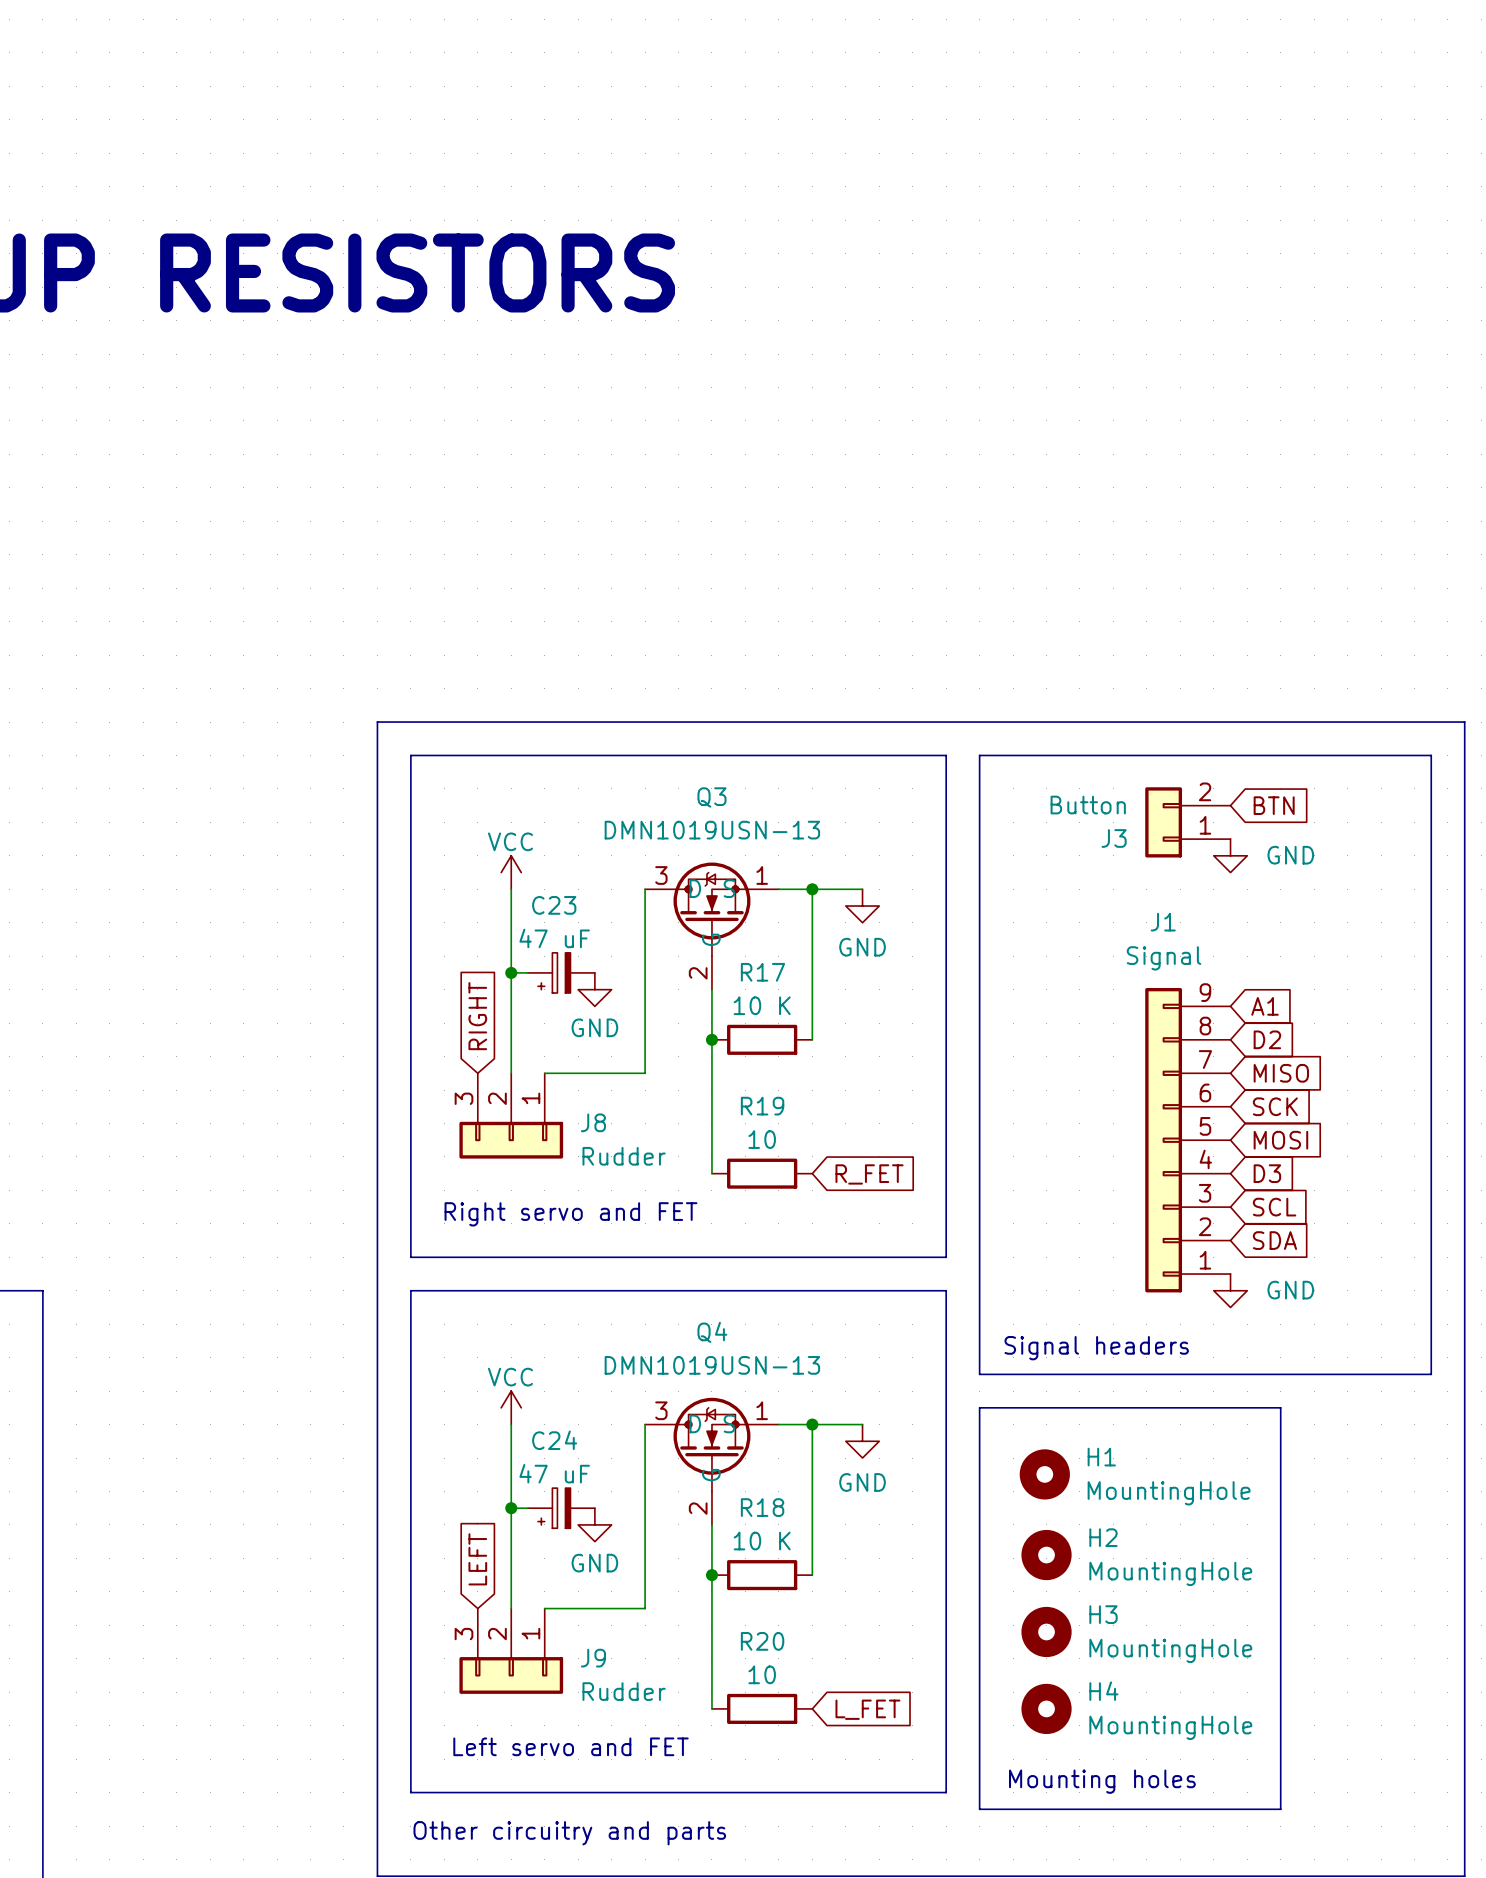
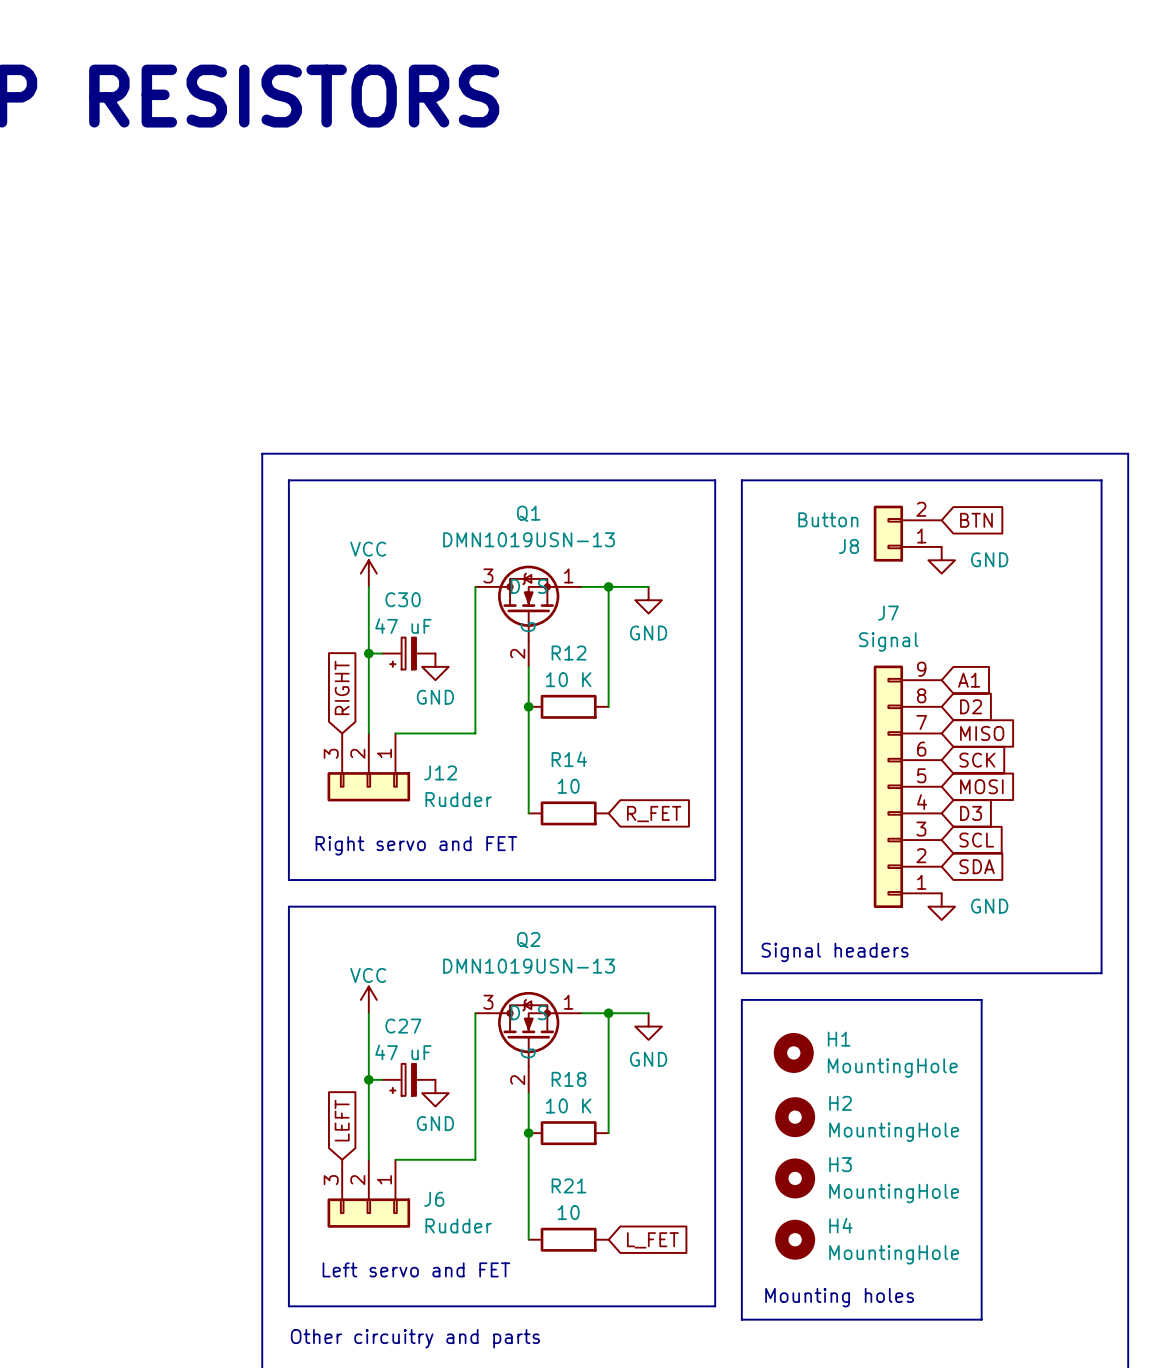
Q3 name: Q3 (711, 797) -> Q1 (528, 513)
J3 name: J3 (1114, 838) -> J8 (848, 546)
C23 name: C23 (554, 905) -> C30 (403, 599)
J1 name: J1 (1163, 922) -> J7 (888, 613)
R17 name: R17 (762, 972) -> R12 (568, 653)
R19 name: R19 (762, 1106) -> R14 (569, 759)
J8 name: J8 (593, 1122) -> J12 (440, 772)
Q4 name: Q4 (712, 1332) -> Q2 (528, 940)
C24 name: C24 (554, 1440) -> C27 (403, 1026)
R20 name: R20 (762, 1641) -> R21 (568, 1185)
J9 name: J9 (593, 1658) -> J6 (434, 1199)

